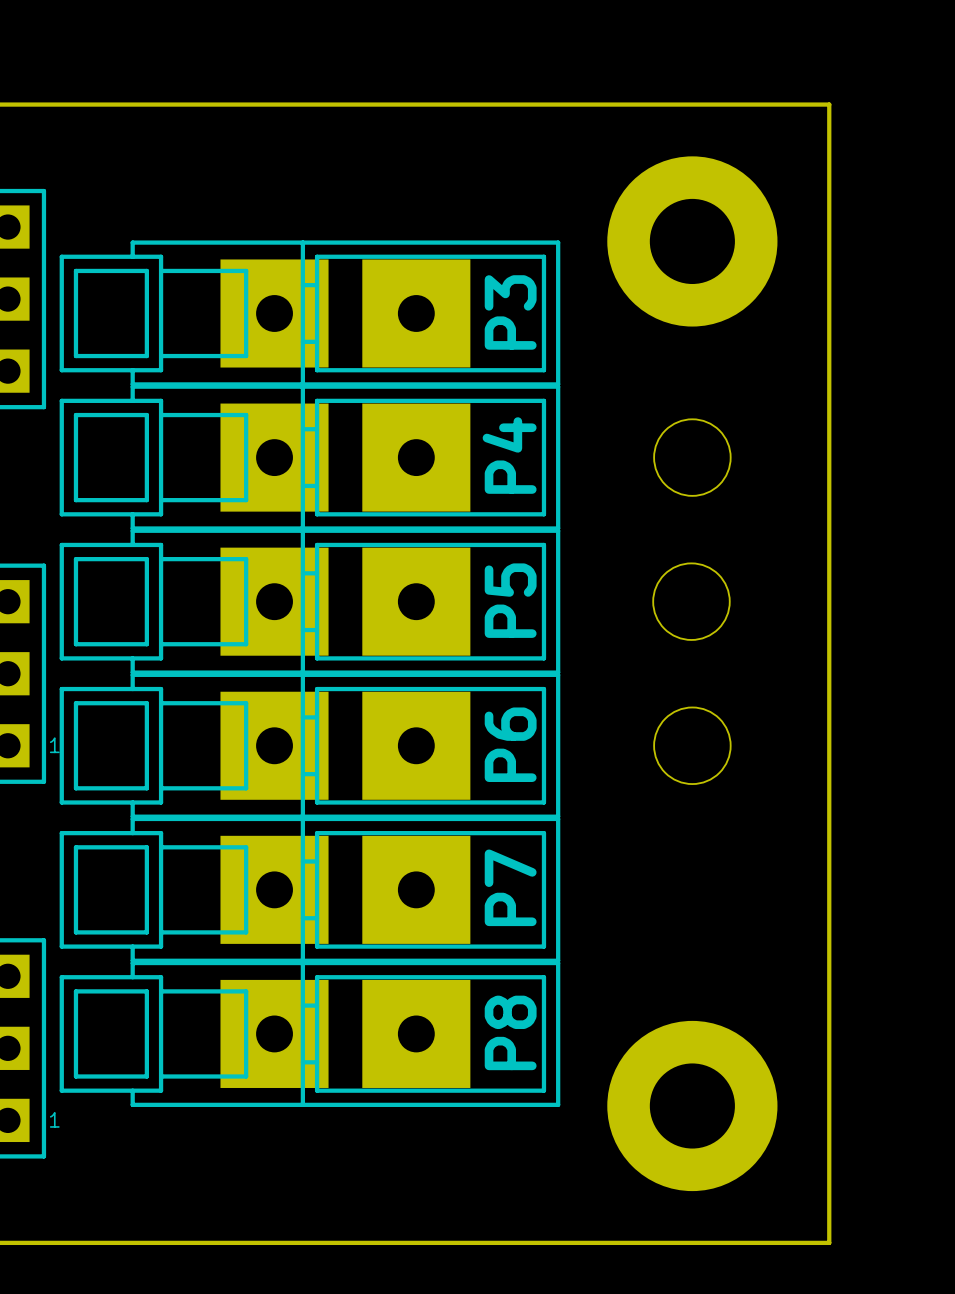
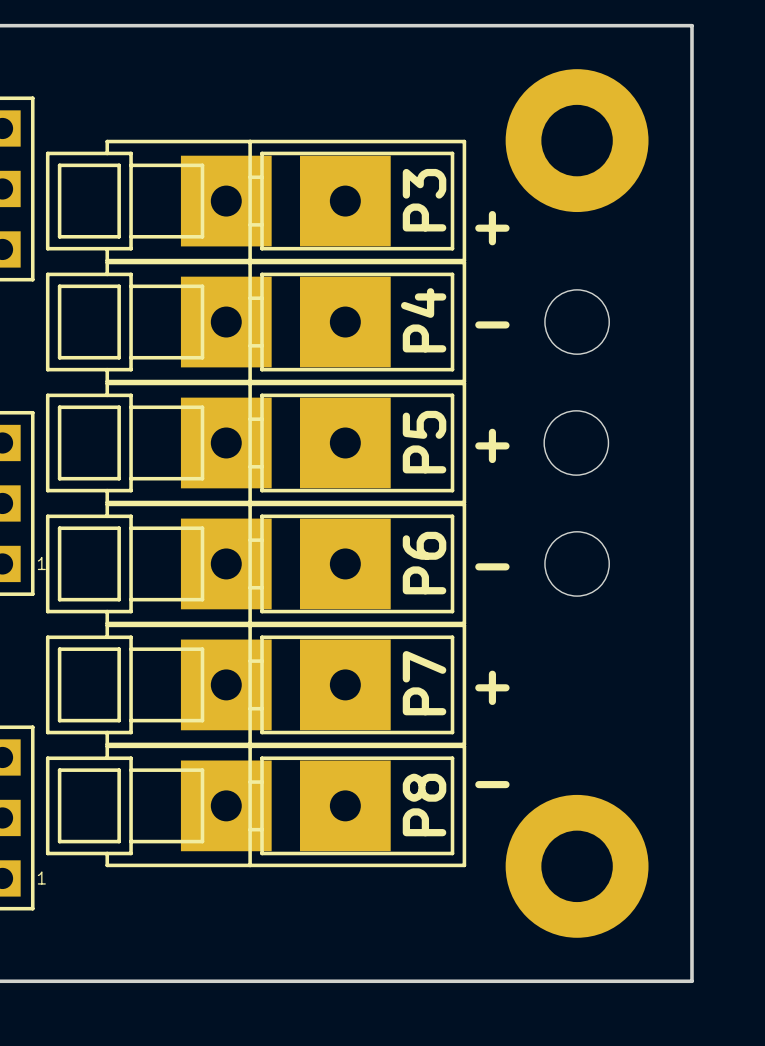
text: none -> + (492, 228)
text: none -> - (492, 324)
text: none -> + (492, 445)
text: none -> - (492, 566)
text: none -> + (492, 687)
text: none -> - (492, 784)

